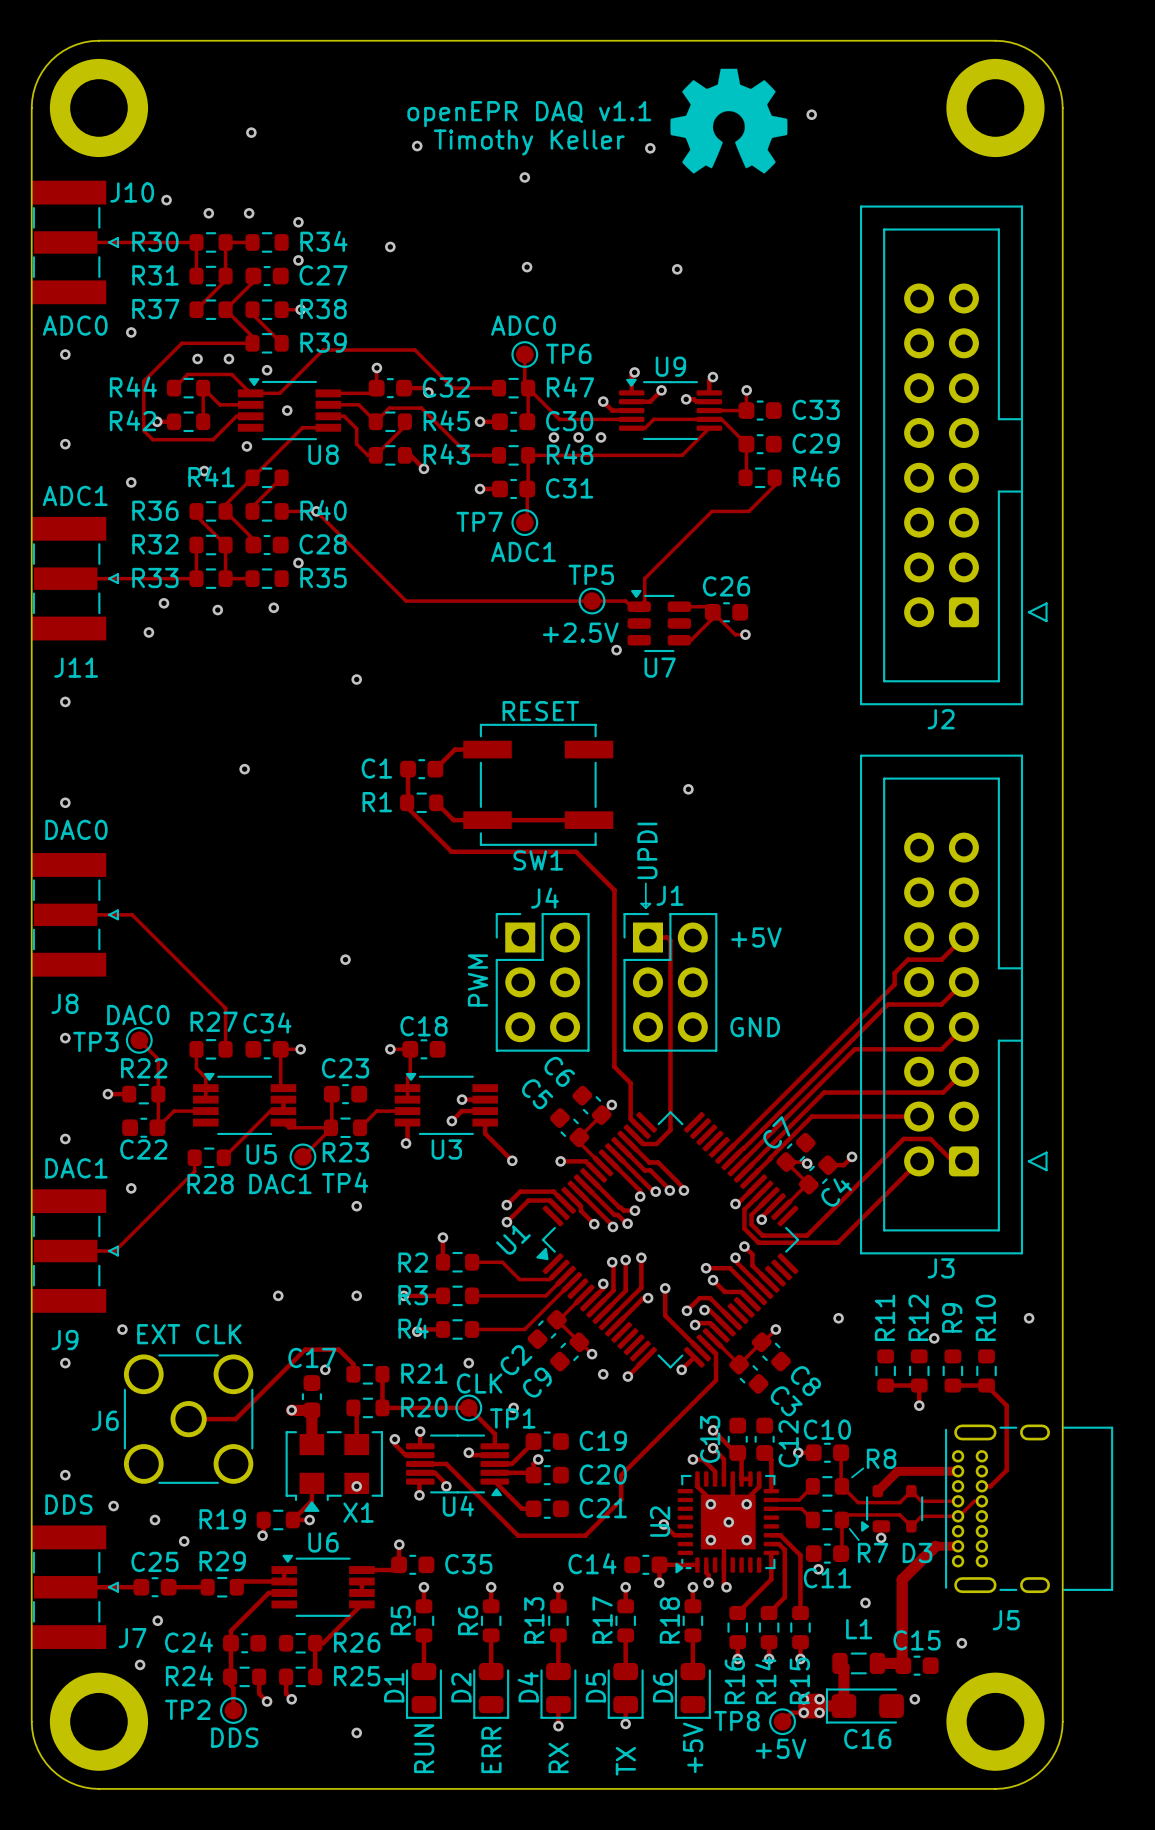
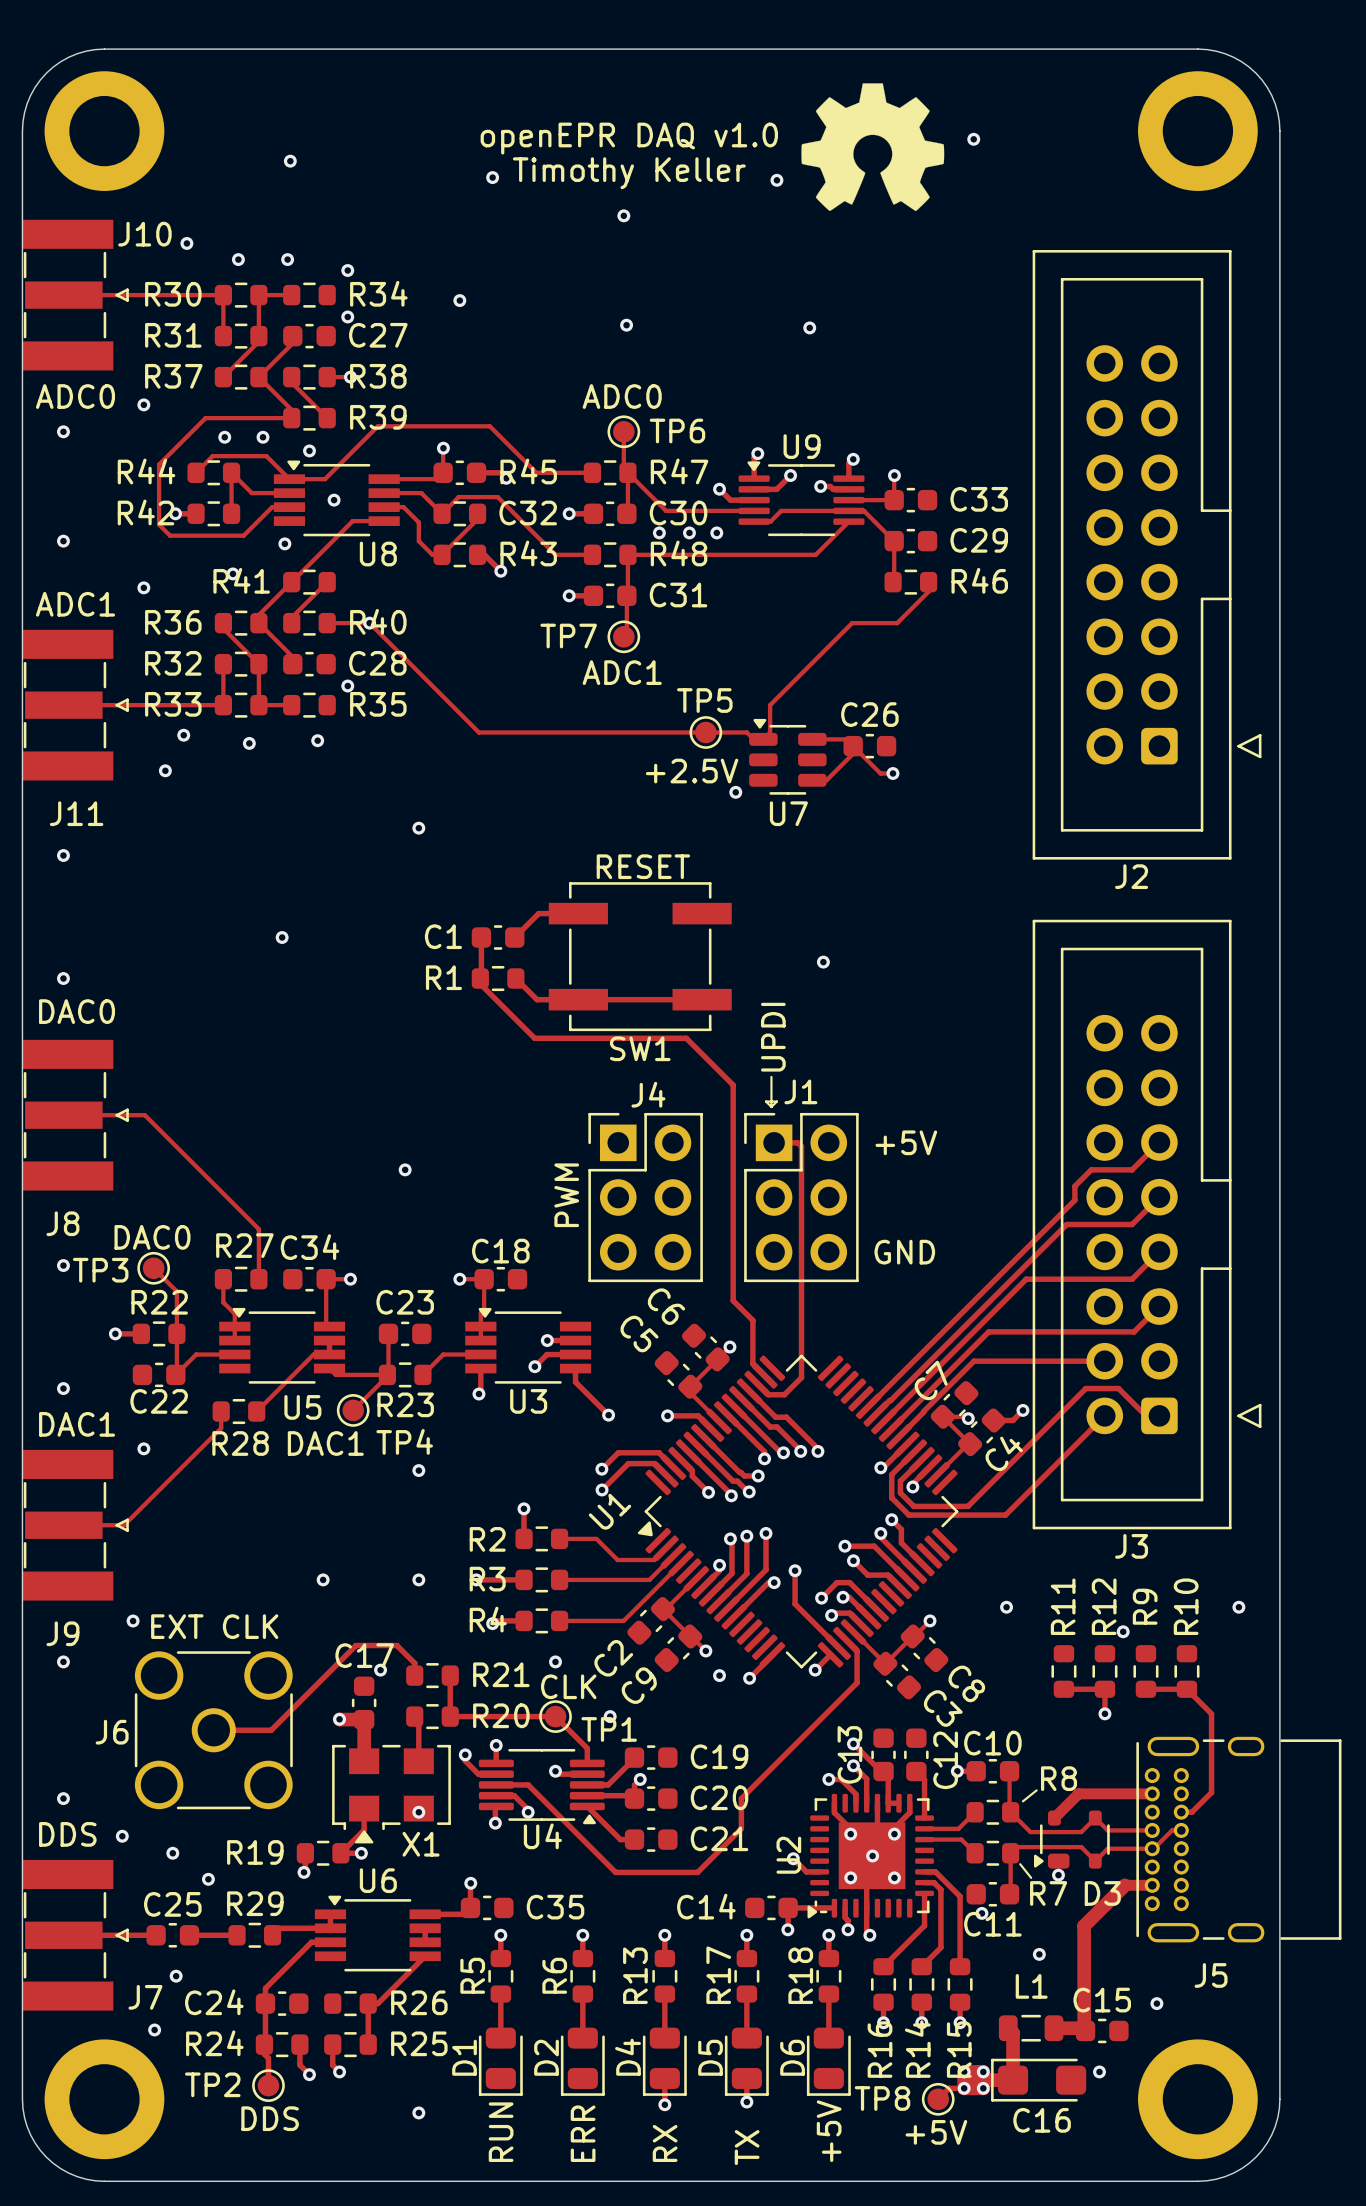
text: openEPR DAQ v1.1 (529, 114) -> openEPR DAQ v1.0 (629, 138)
C32 name position: C32 (446, 387) -> C32 (528, 513)
R45 name position: R45 (446, 420) -> R45 (528, 471)

